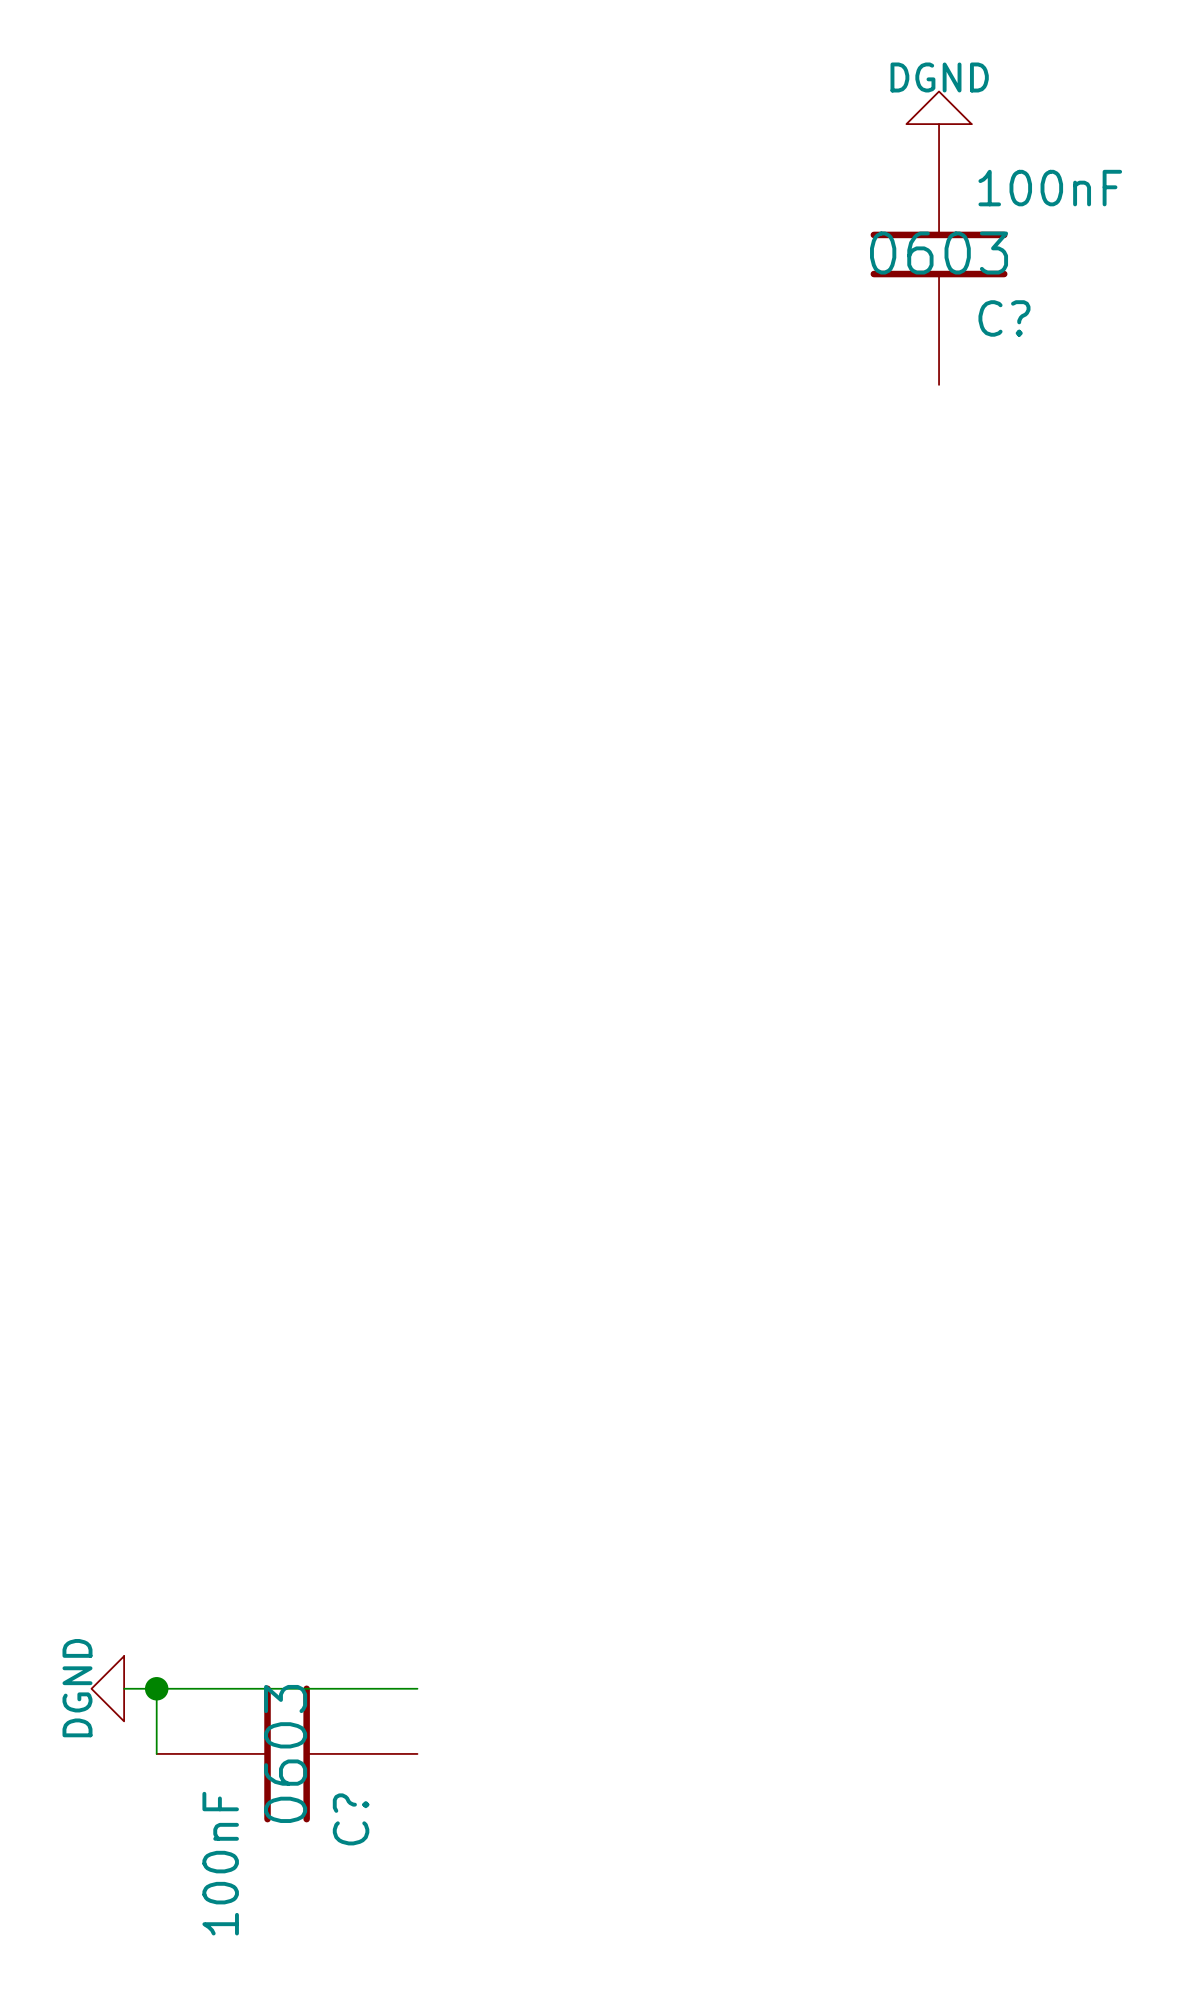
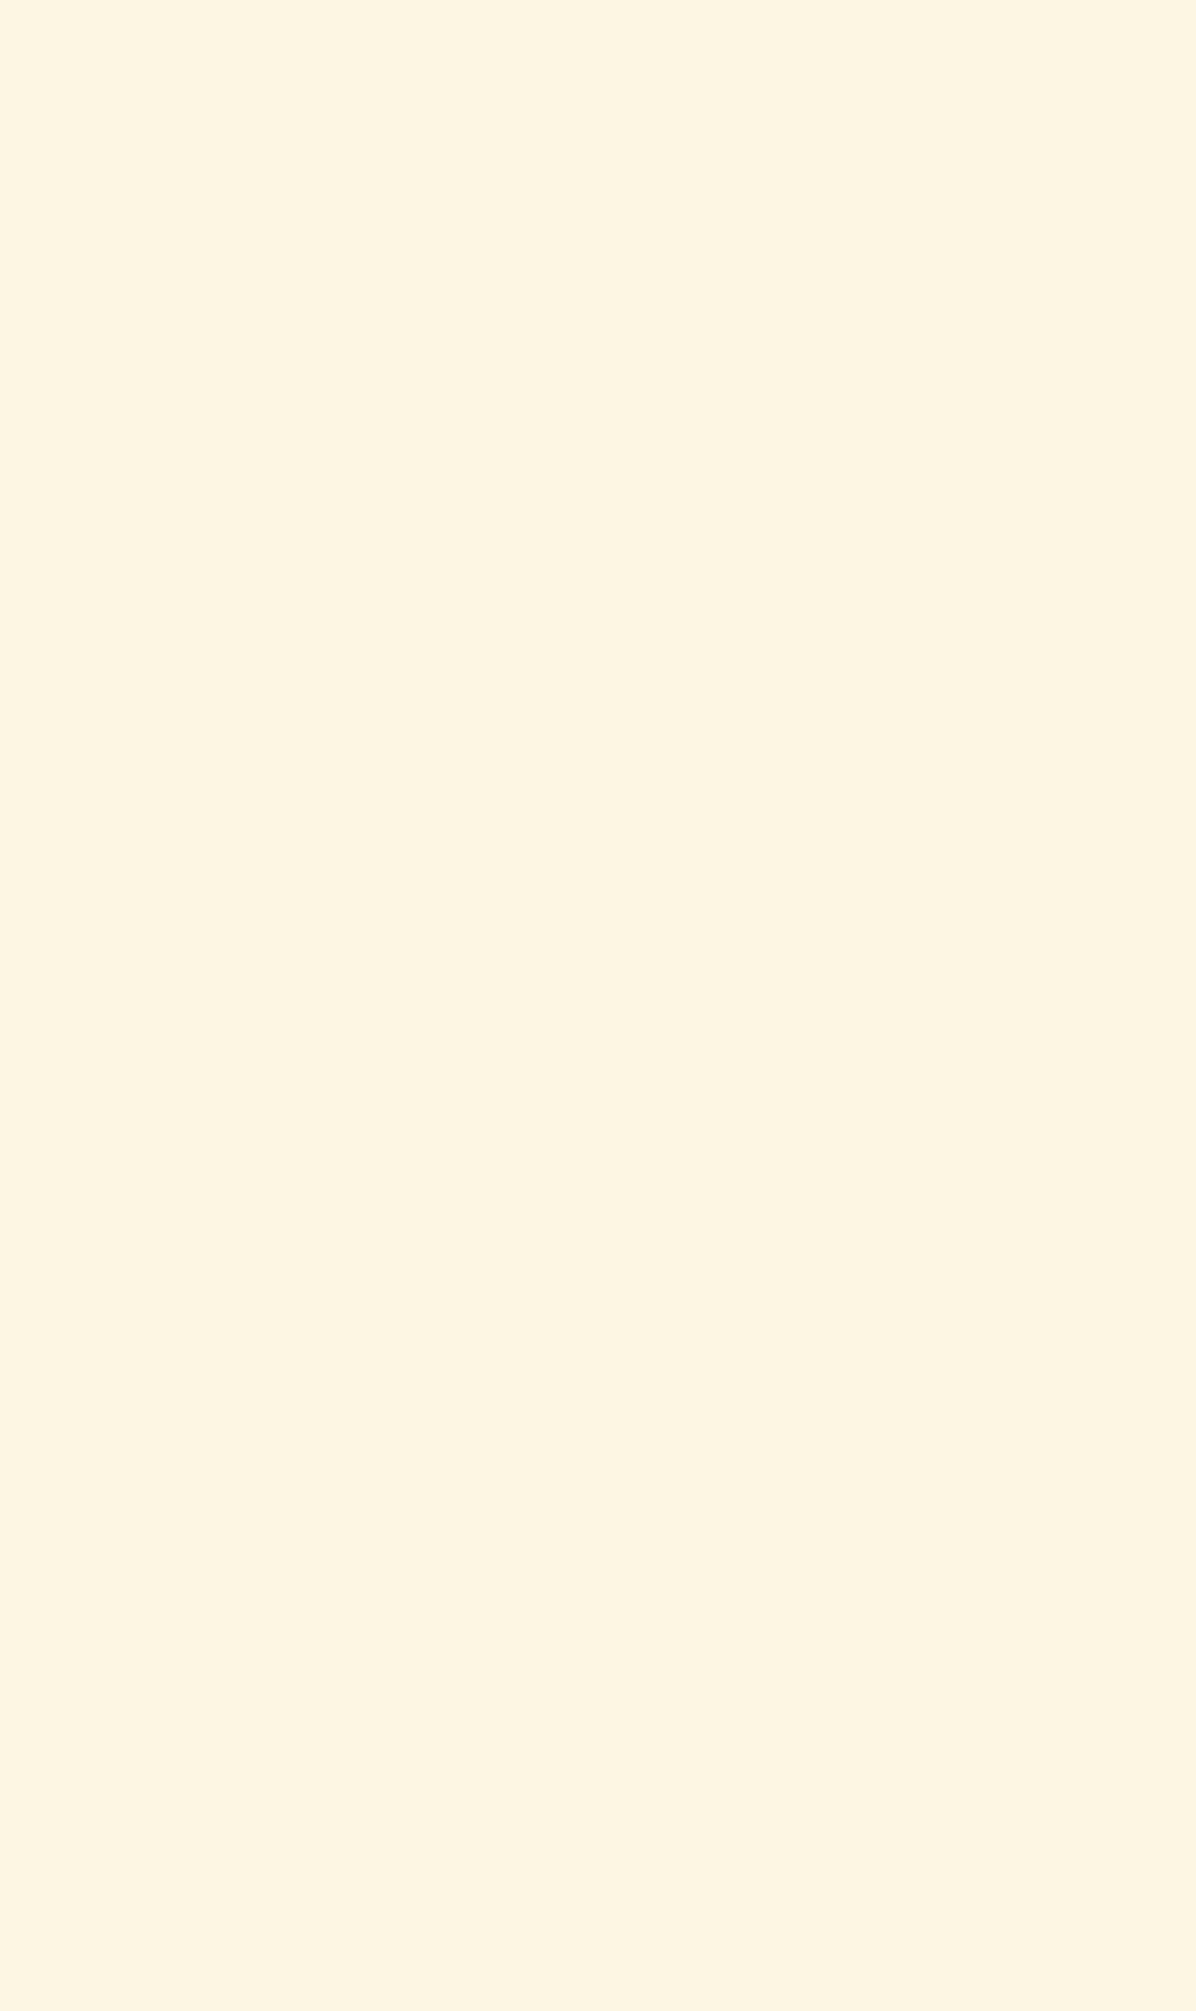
power symbol: DGND (939, 107) -> none
C?: 100nF (939, 254) -> none
power symbol: DGND (107, 1688) -> none
wire: (124, 1688) (417, 1688) -> none
wire: (156, 1688) (156, 1753) -> none
junction: (156, 1688) -> none
C?: 100nF (287, 1753) -> none

